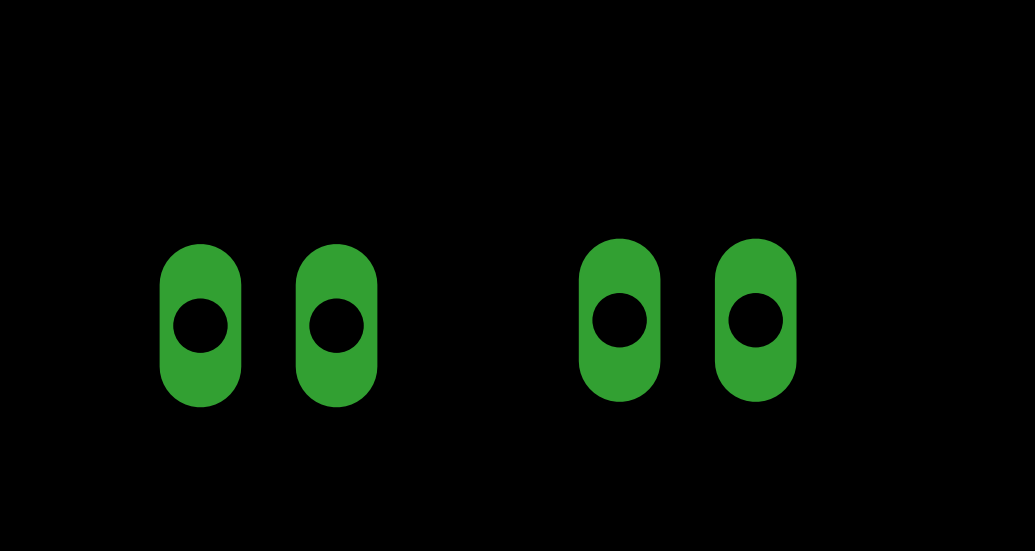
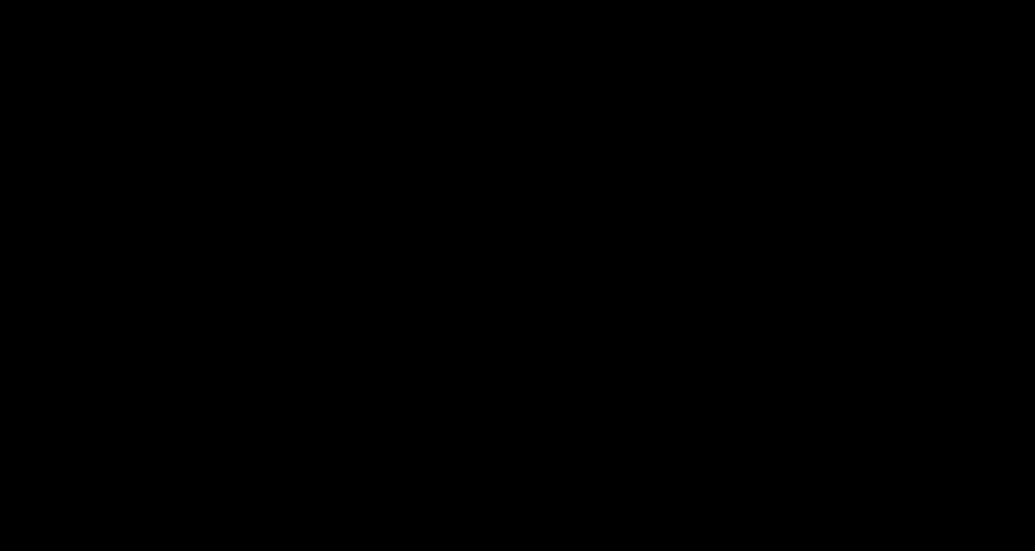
part: (687, 320) -> none
part: (268, 325) -> none

